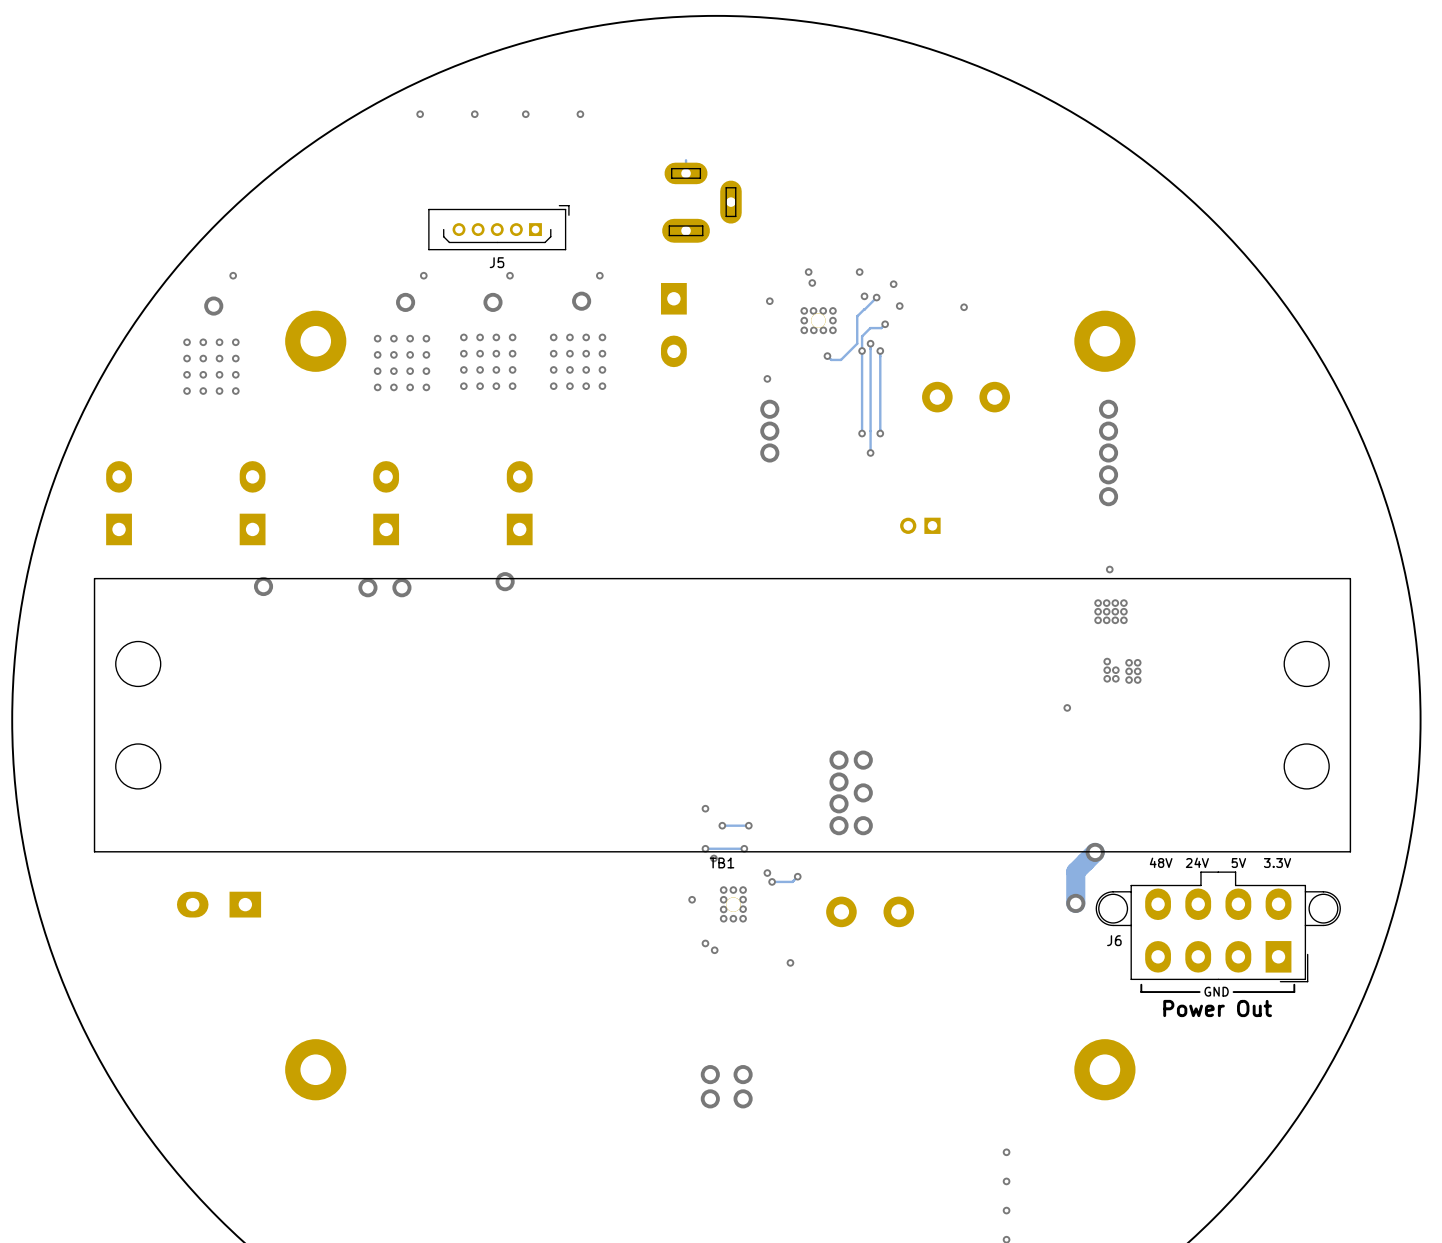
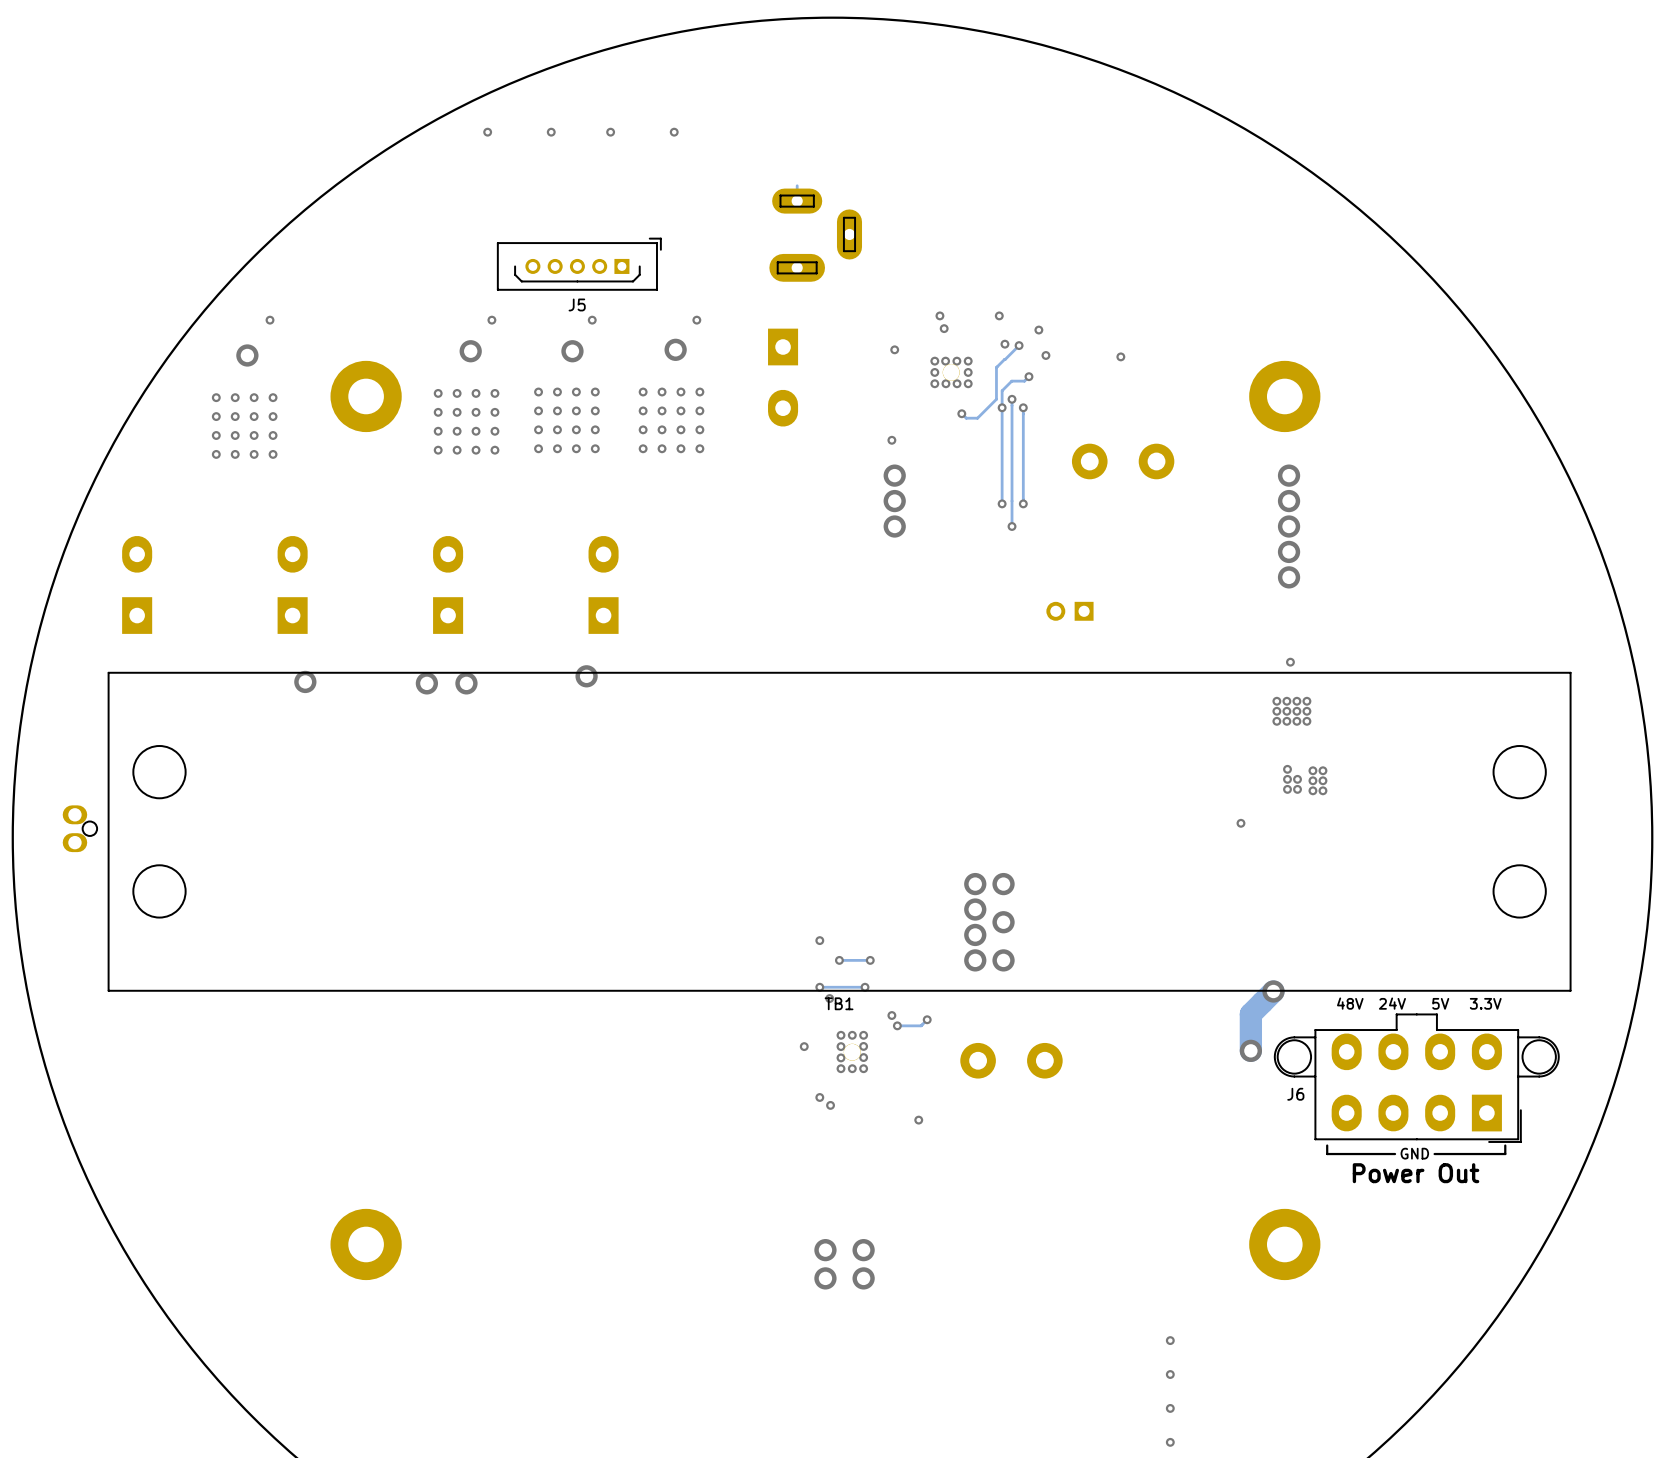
part: none -> (79, 828)
part: (219, 904) -> none

